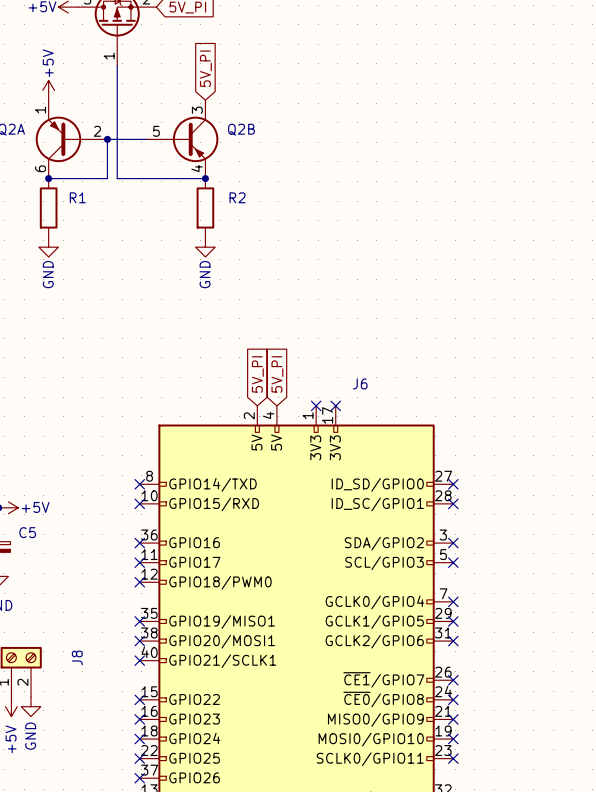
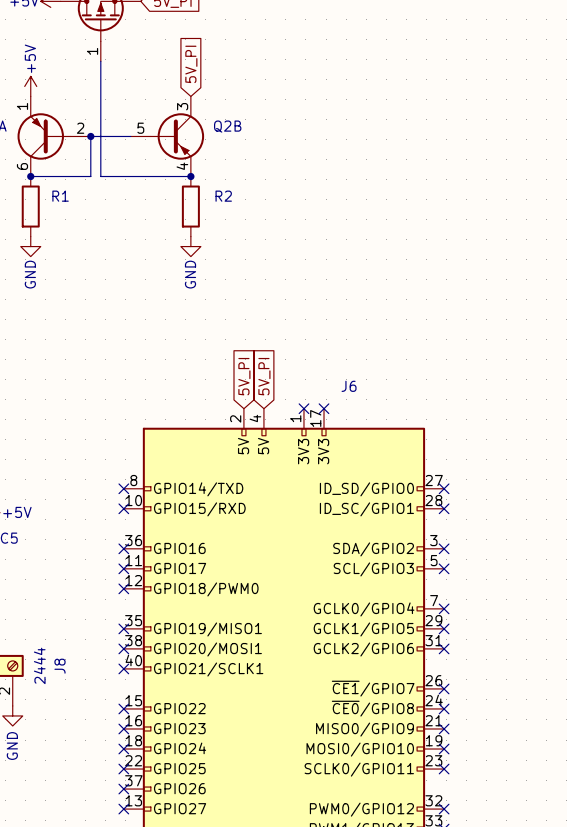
J8 value: none -> 2444 (39, 665)

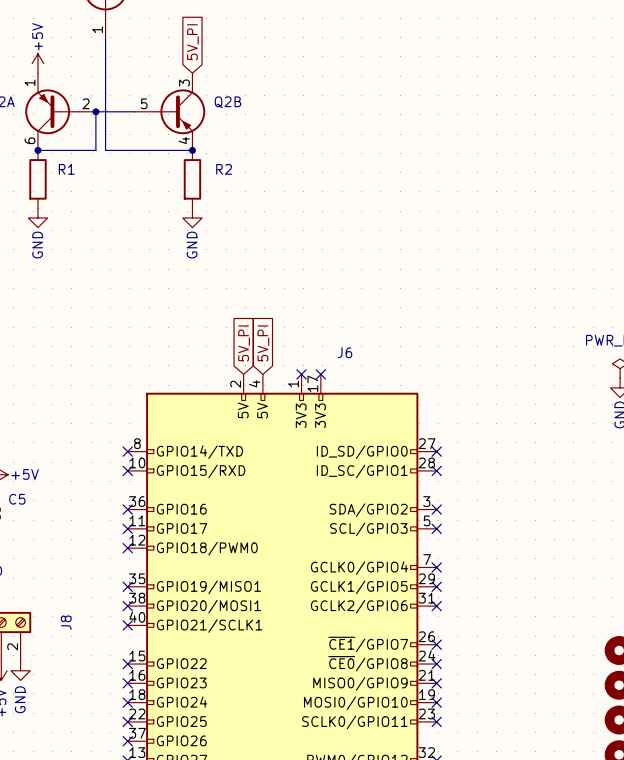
J8 value: 2444 (39, 665) -> none

